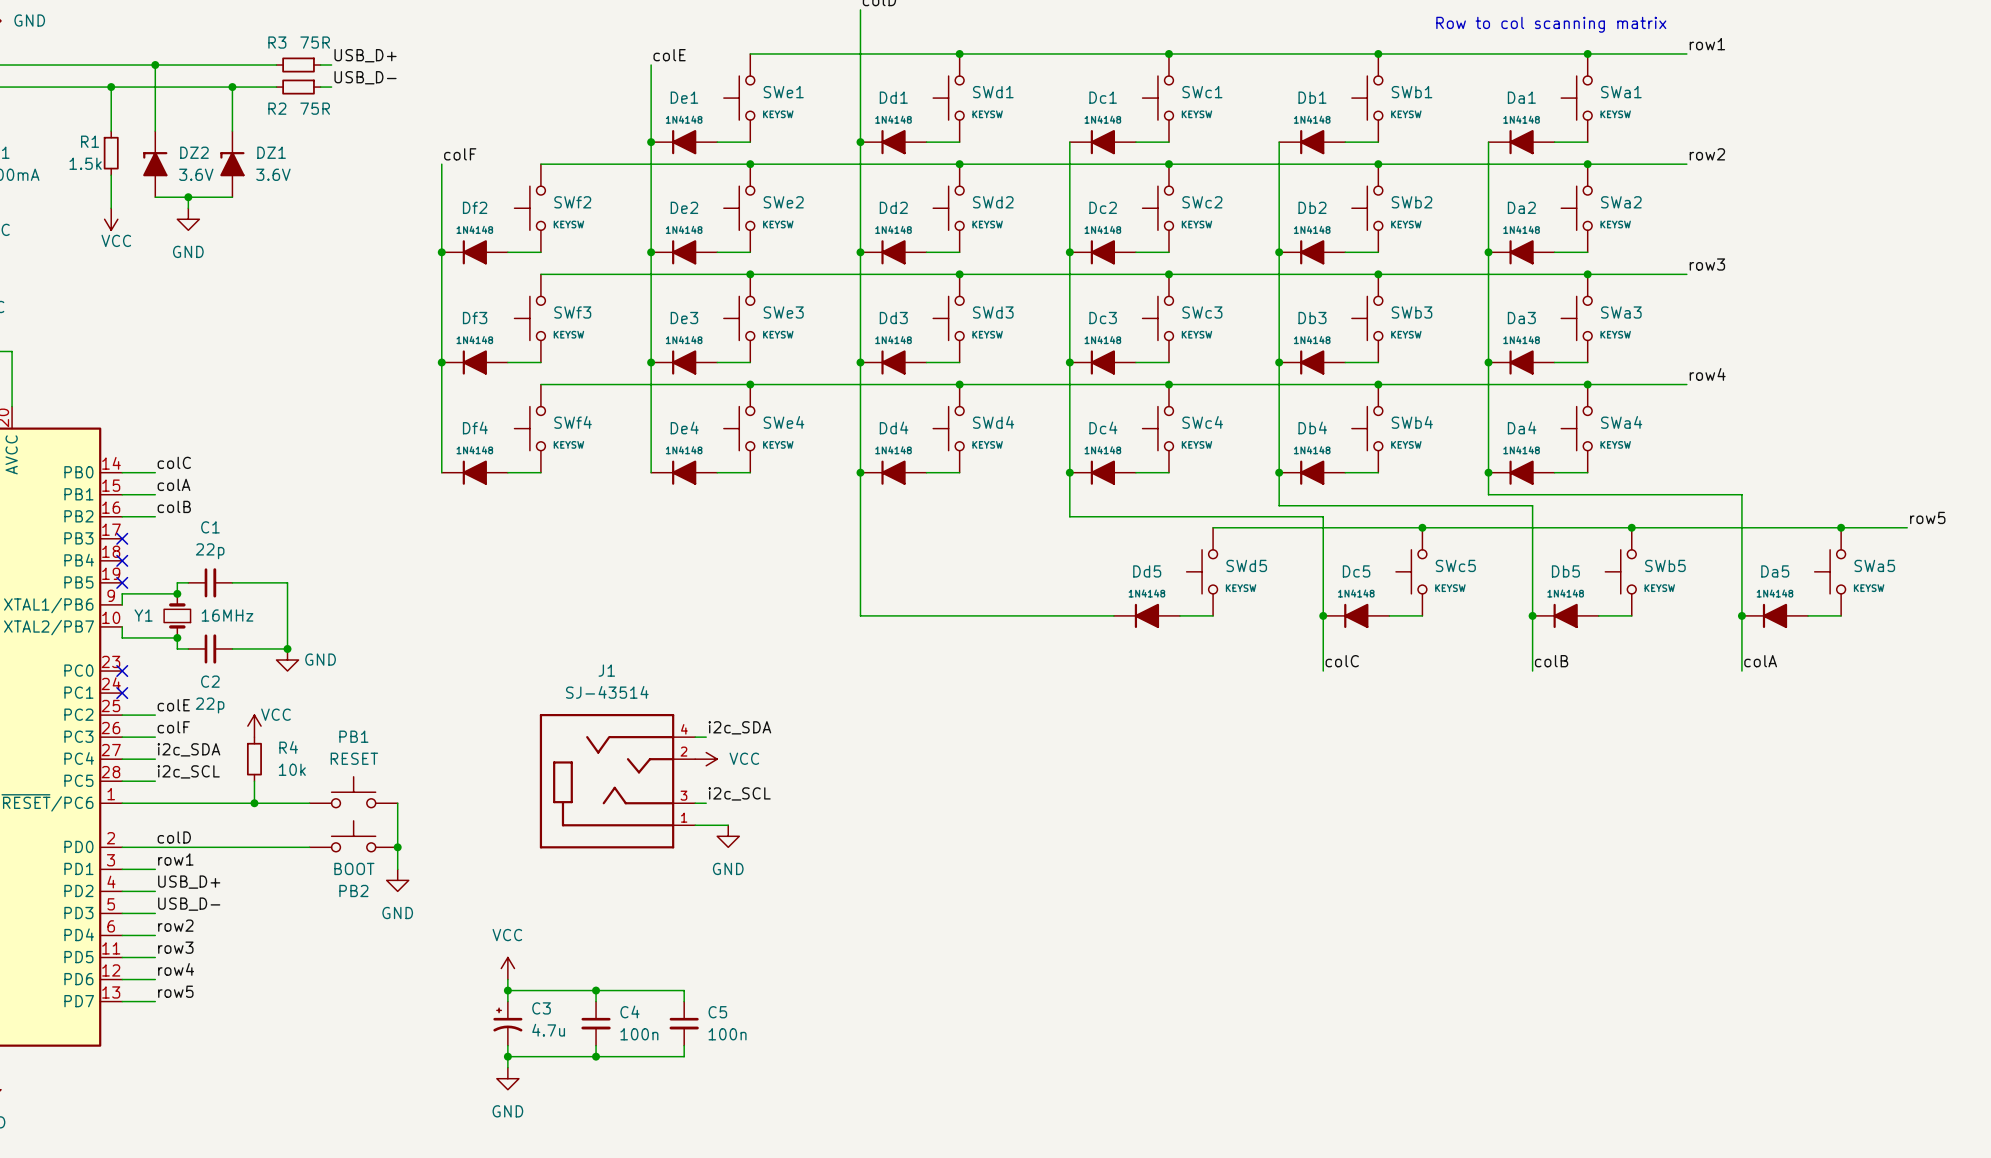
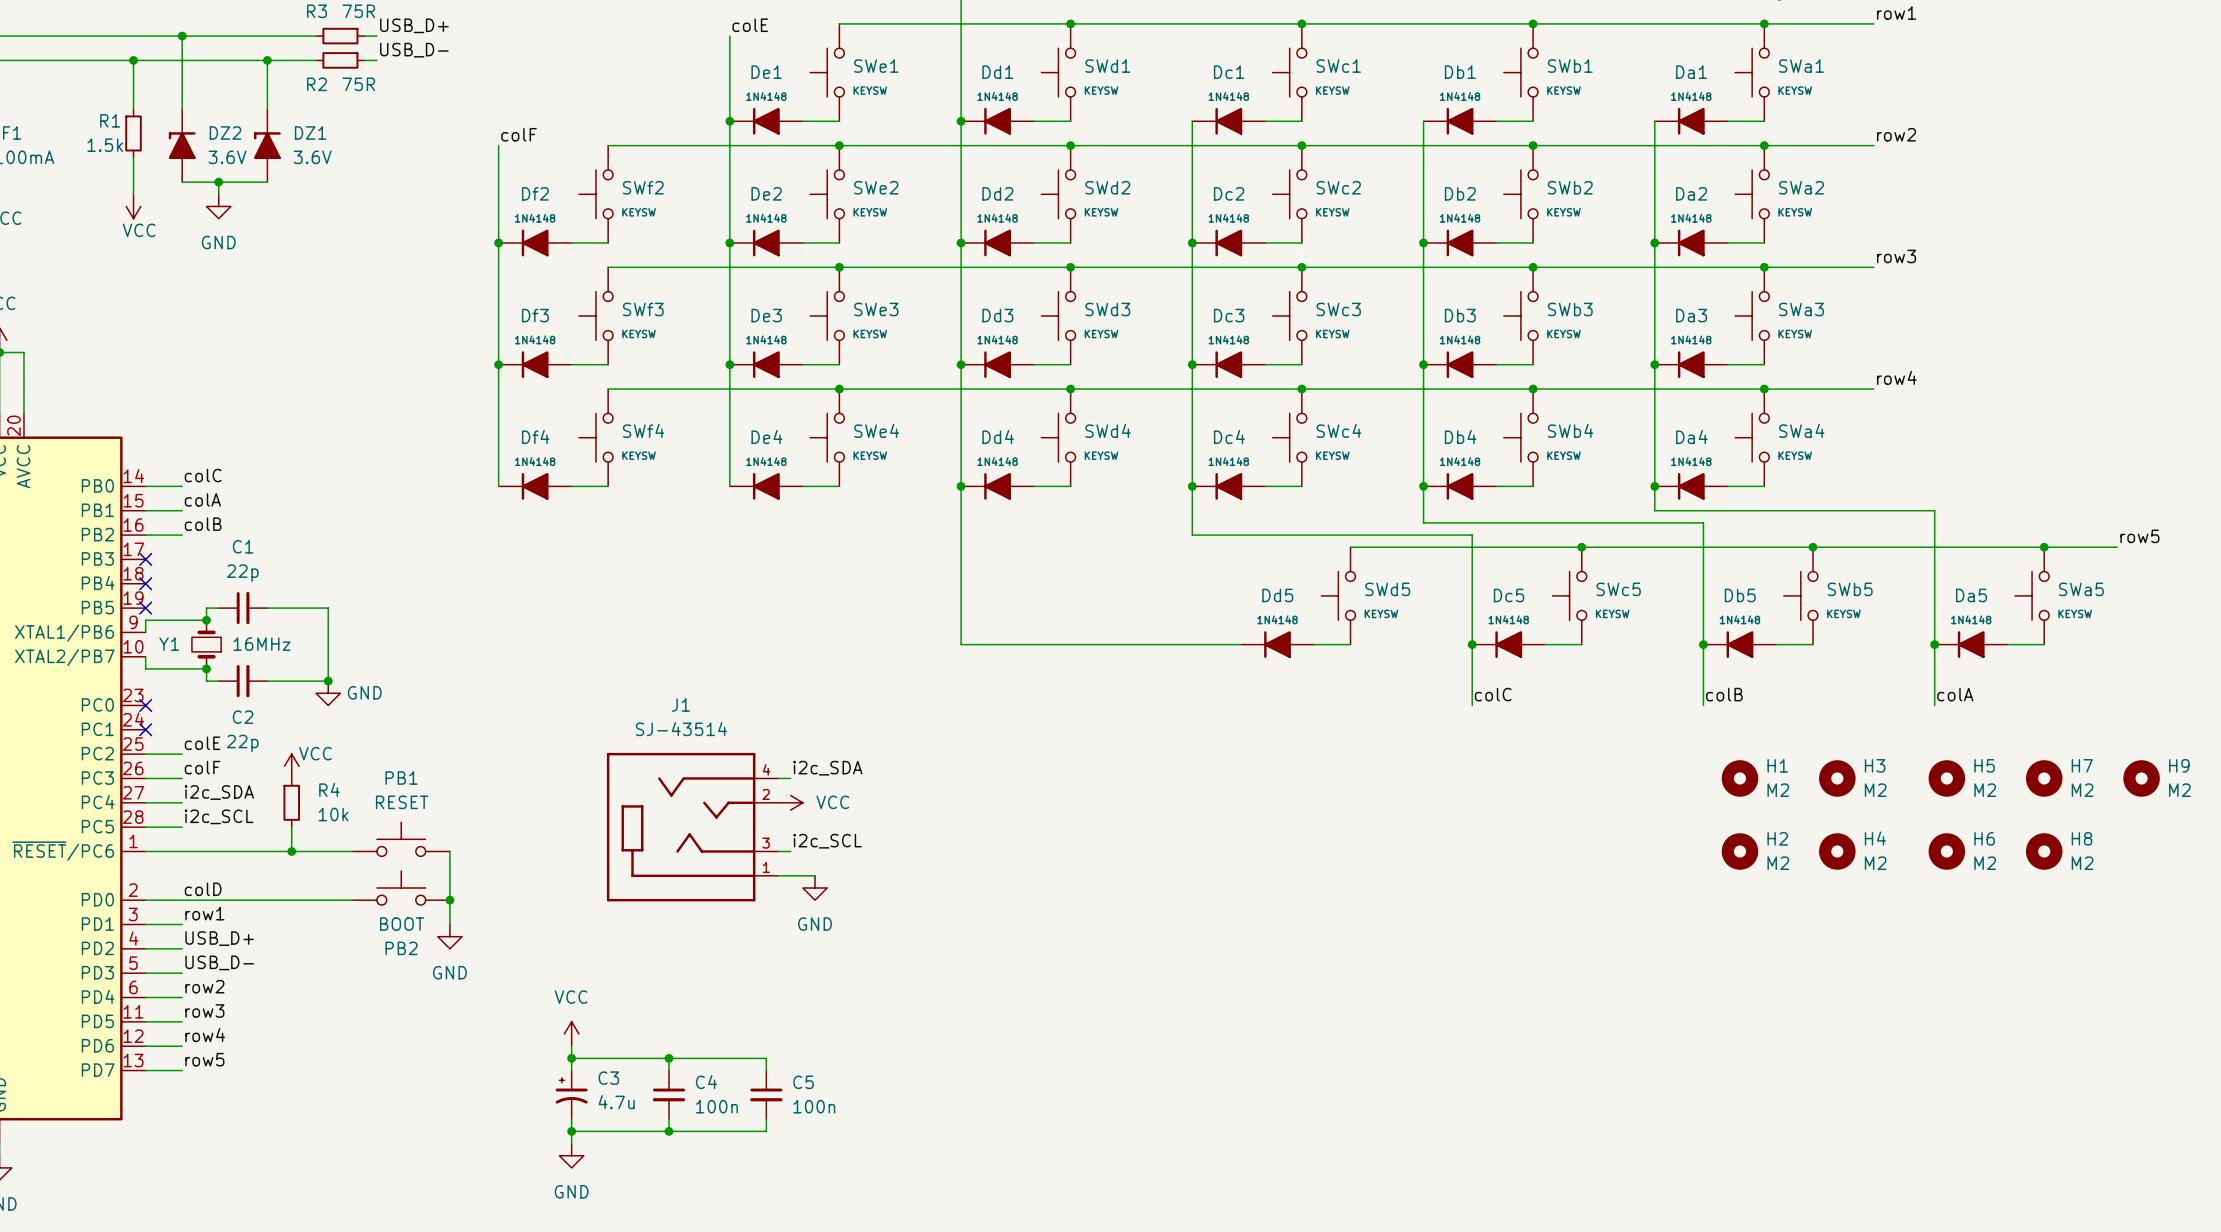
H1: none -> M2 (1739, 778)
H3: none -> M2 (1837, 778)
H5: none -> M2 (1946, 778)
H7: none -> M2 (2044, 778)
H9: none -> M2 (2141, 778)
H2: none -> M2 (1739, 851)
H4: none -> M2 (1837, 851)
H6: none -> M2 (1946, 851)
H8: none -> M2 (2044, 851)

